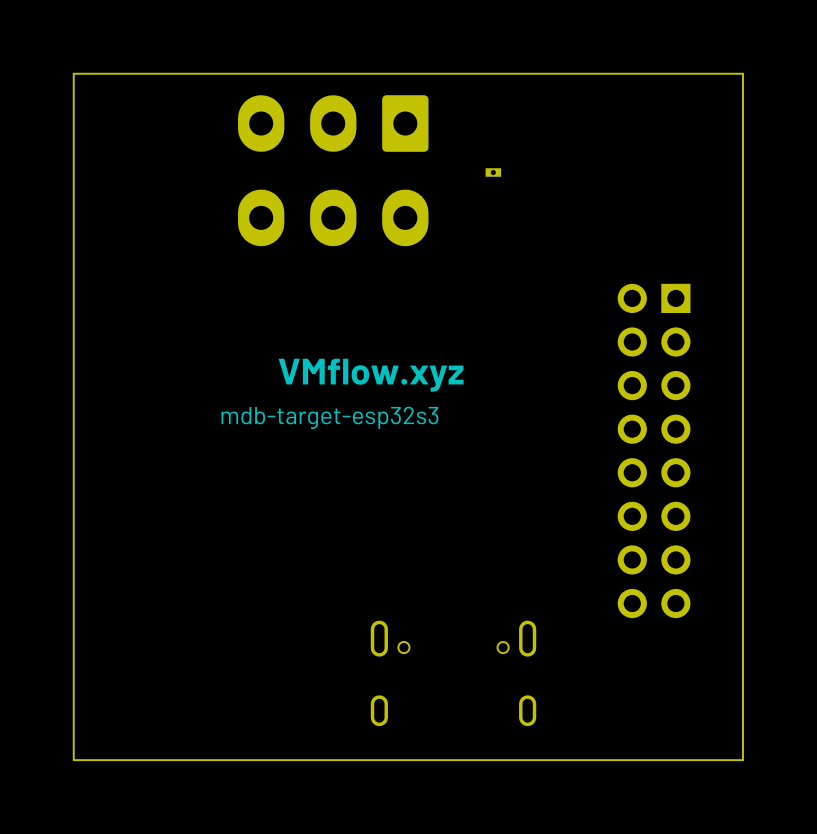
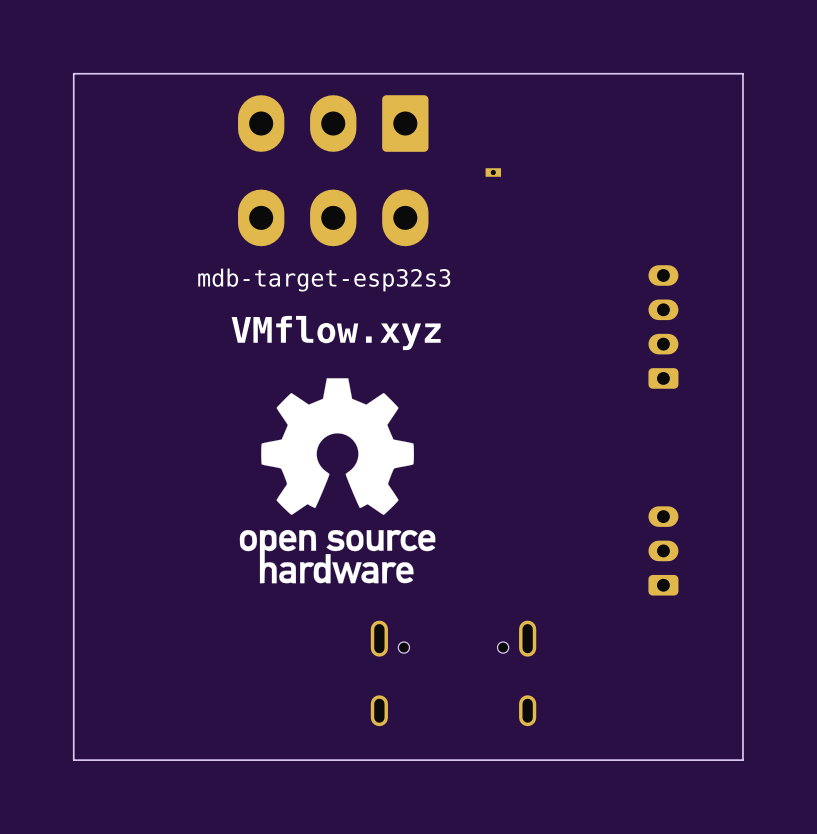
part: none -> (663, 326)
text position: VMflow.xyz (371, 375) -> VMflow.xyz (336, 332)
drawing: none -> [239, 378, 436, 584]
text position: mdb-target-esp32s3 (329, 417) -> mdb-target-esp32s3 (324, 280)
part: (654, 450) -> none
part: none -> (663, 550)

